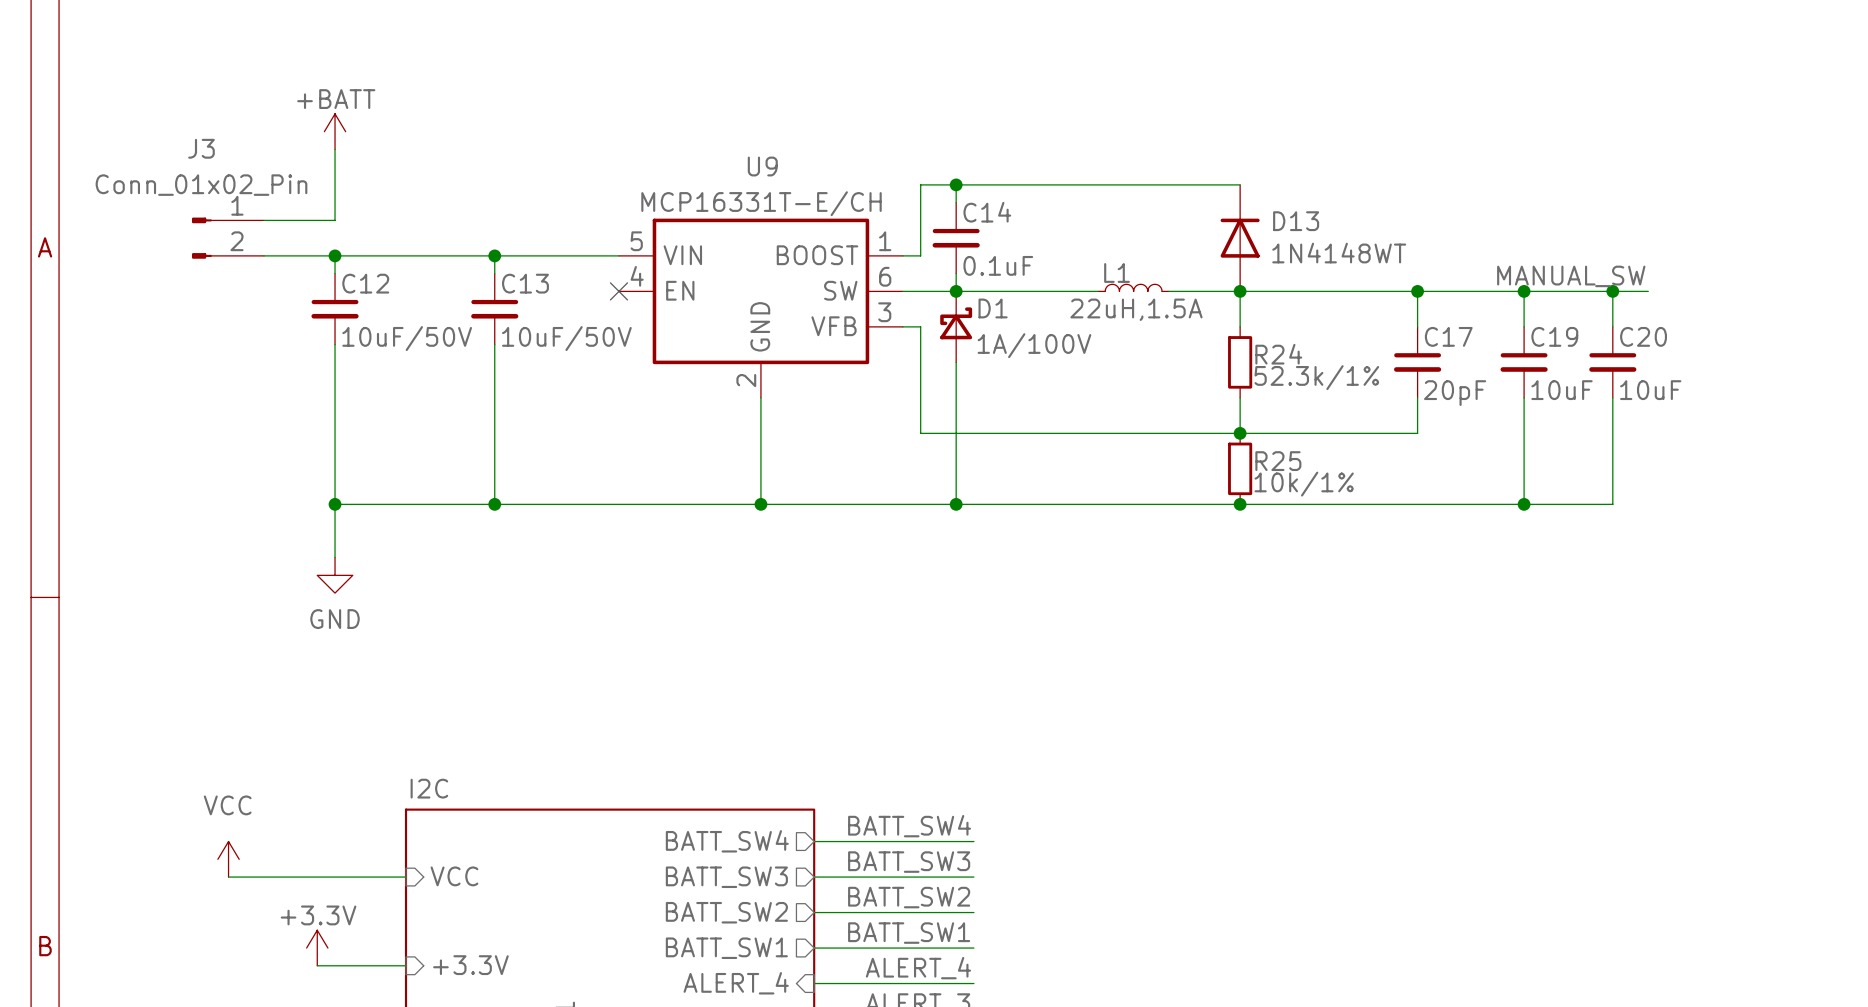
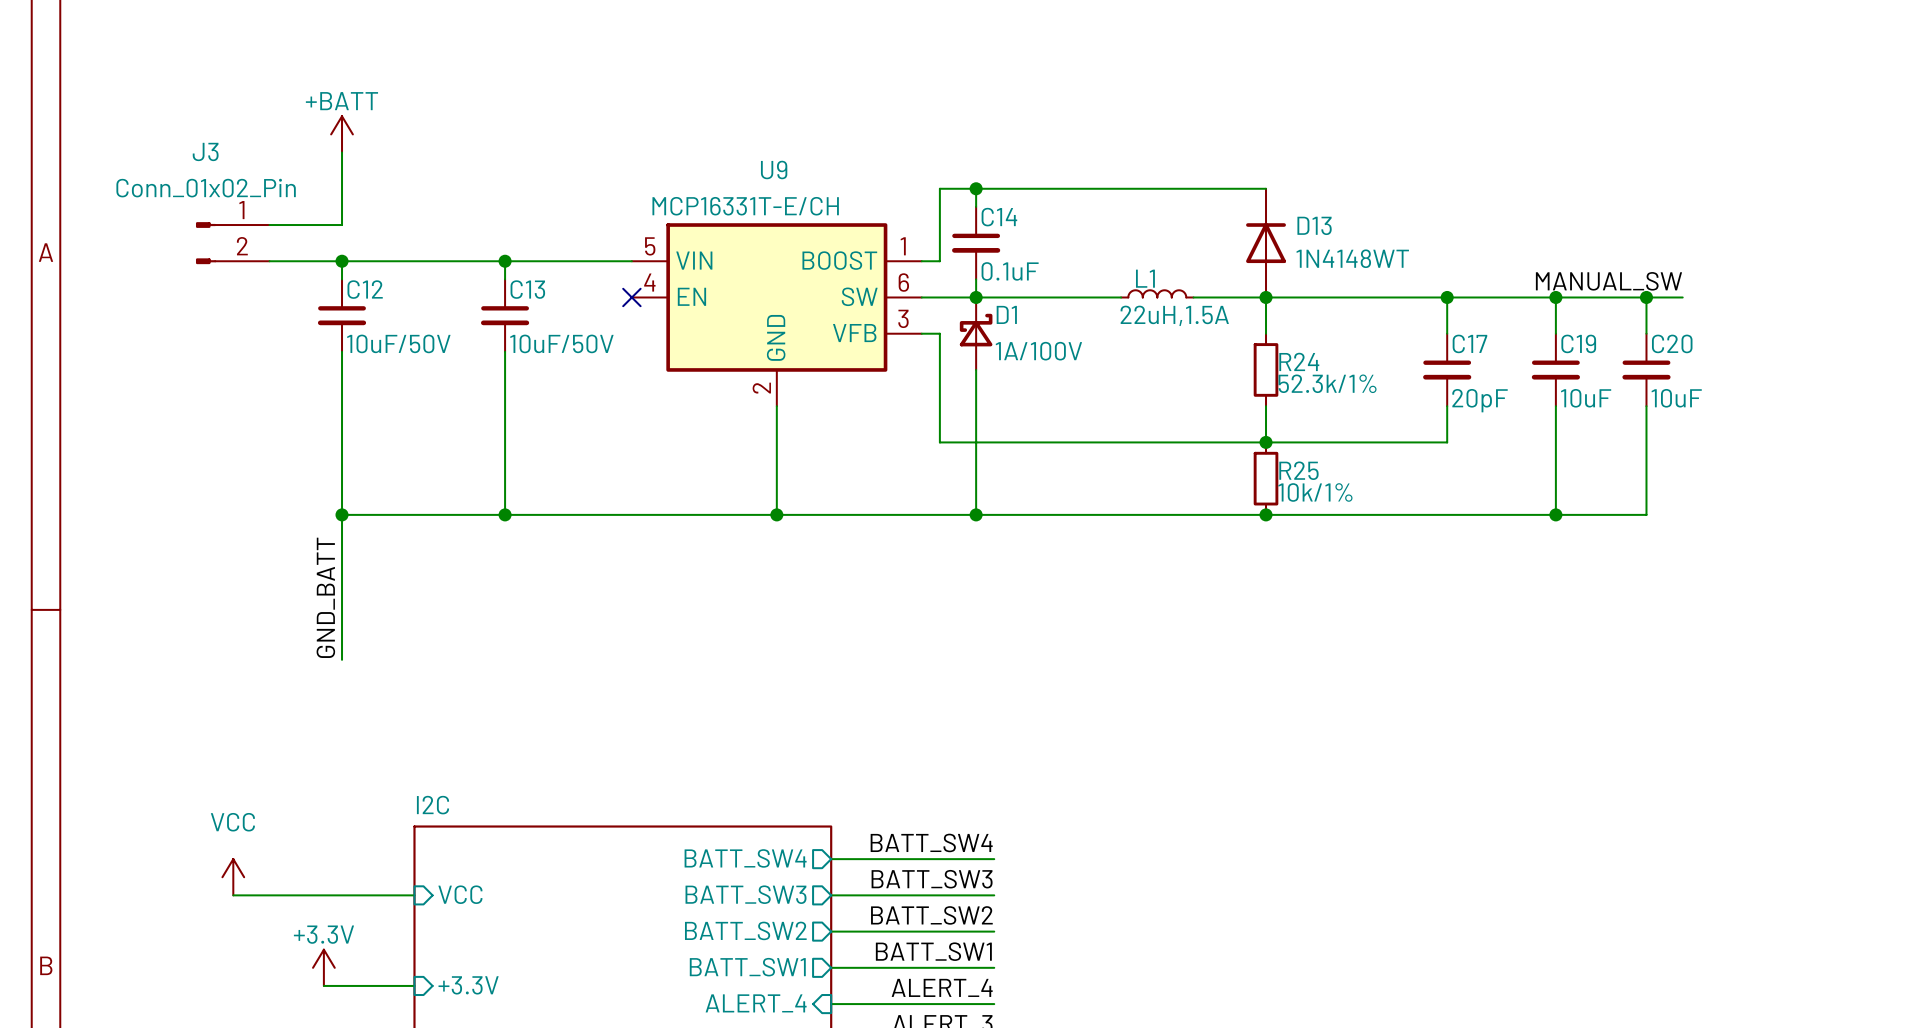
wire: none -> (342, 569) (342, 659)
power symbol: GND (335, 575) -> none
label: none -> GND_BATT (325, 597)

